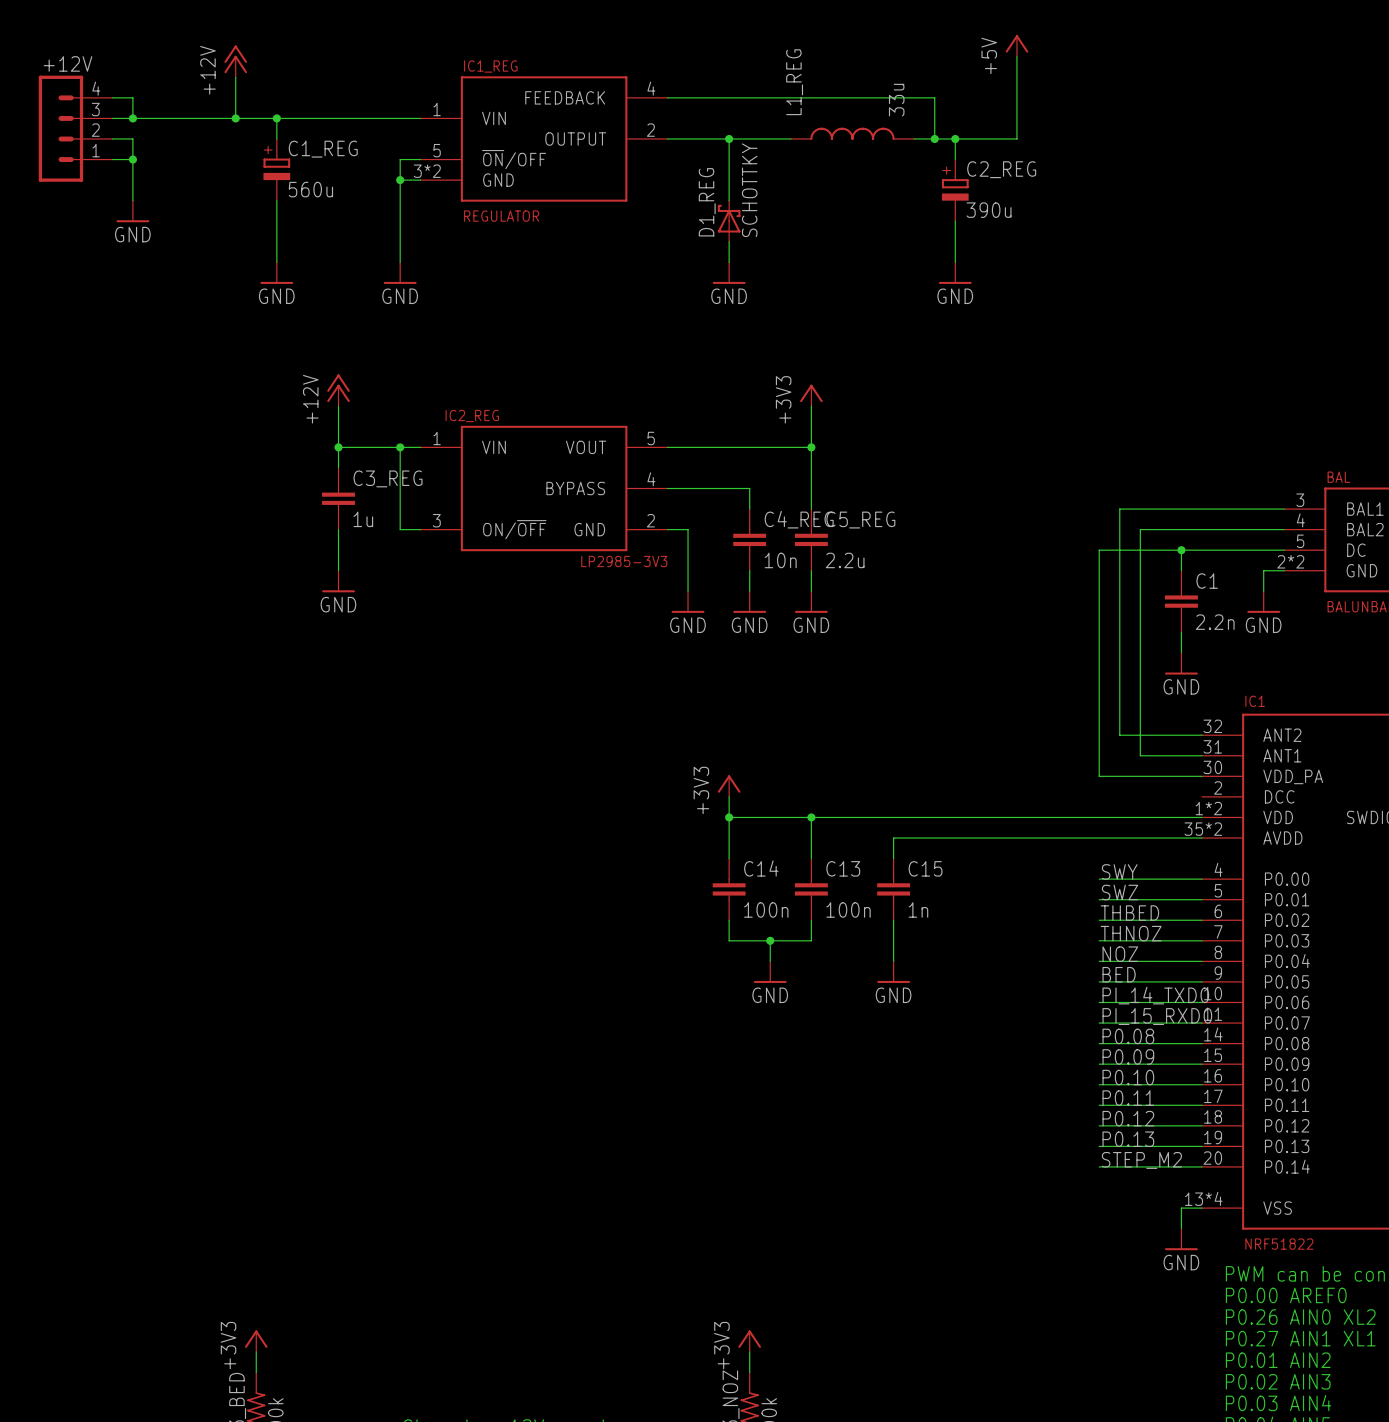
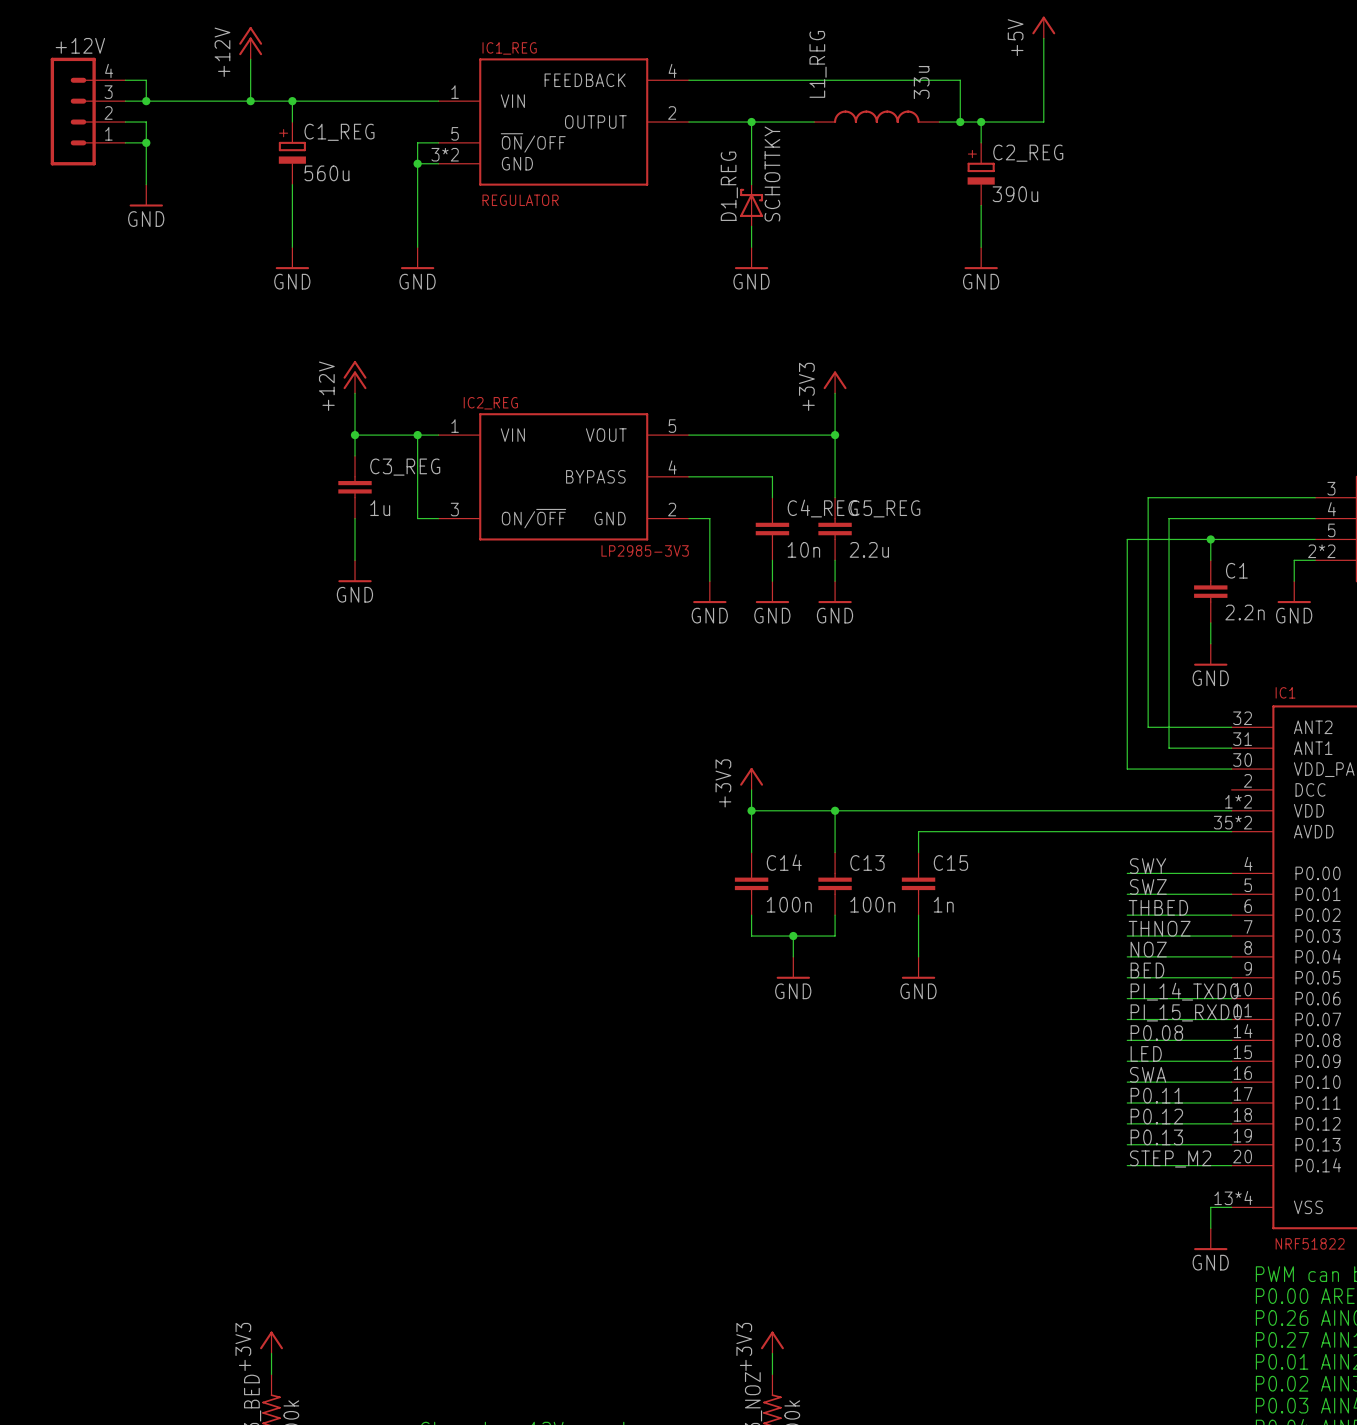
label: P0.09 (1128, 1056) -> LED (1146, 1053)
label: P0.10 (1128, 1077) -> SWA (1148, 1074)

